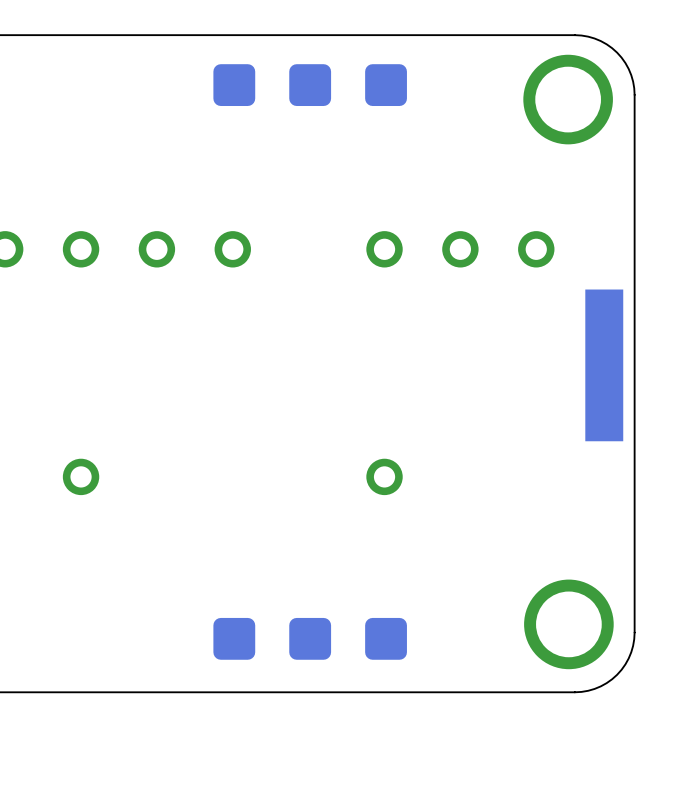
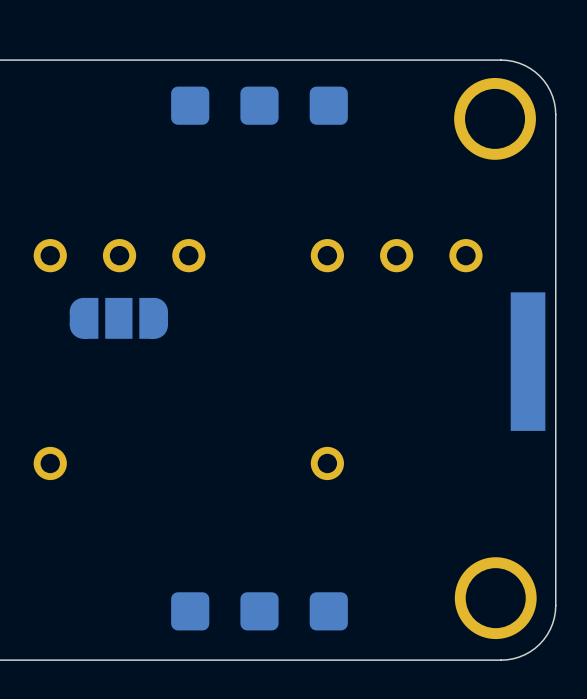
part: none -> (118, 318)

